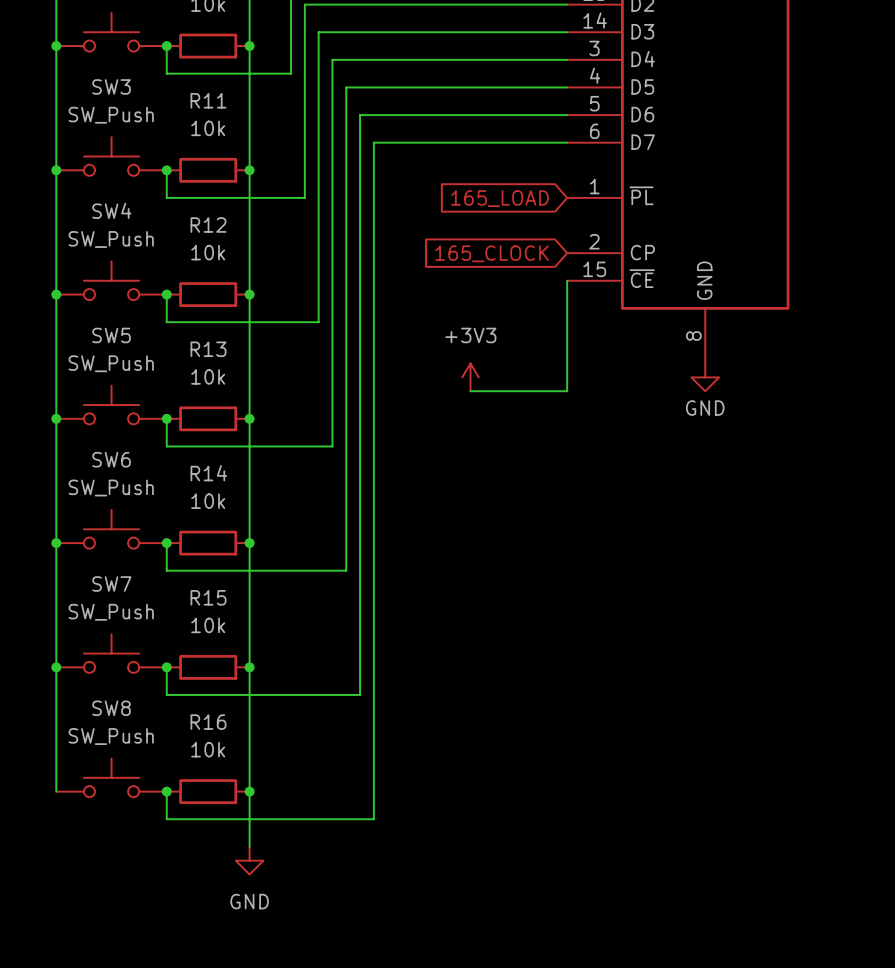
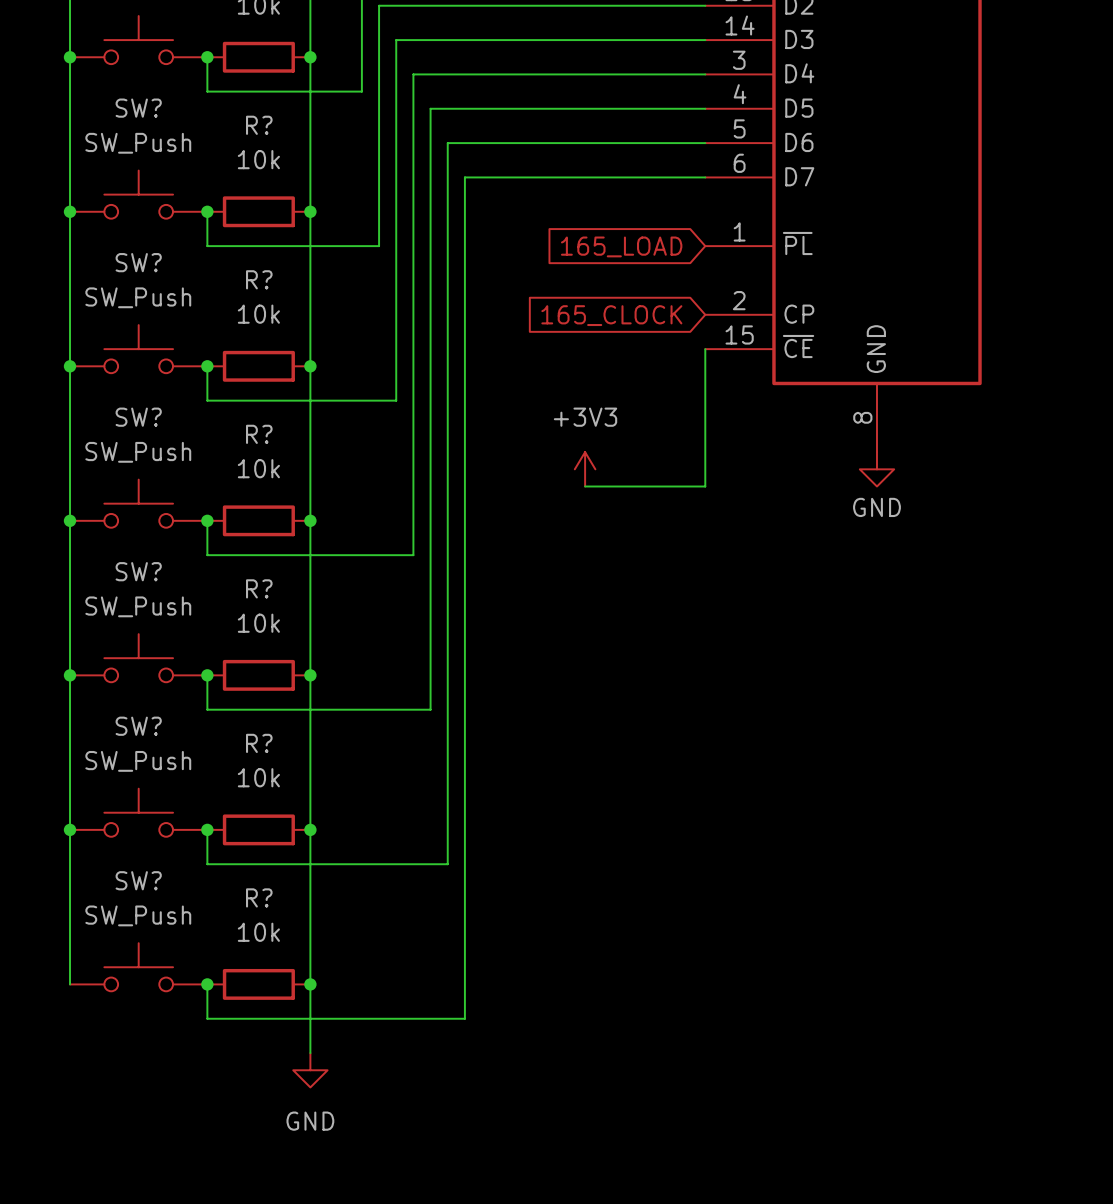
SW3 name: SW3 (111, 86) -> SW? (138, 108)
R11 name: R11 (208, 100) -> R? (259, 125)
SW4 name: SW4 (111, 210) -> SW? (138, 262)
R12 name: R12 (208, 225) -> R? (259, 279)
SW5 name: SW5 (111, 335) -> SW? (138, 417)
R13 name: R13 (208, 349) -> R? (259, 434)
SW6 name: SW6 (111, 459) -> SW? (138, 571)
R14 name: R14 (208, 473) -> R? (259, 588)
SW7 name: SW7 (111, 584) -> SW? (138, 726)
R15 name: R15 (208, 597) -> R? (259, 743)
SW8 name: SW8 (111, 708) -> SW? (138, 880)
R16 name: R16 (208, 722) -> R? (259, 897)

